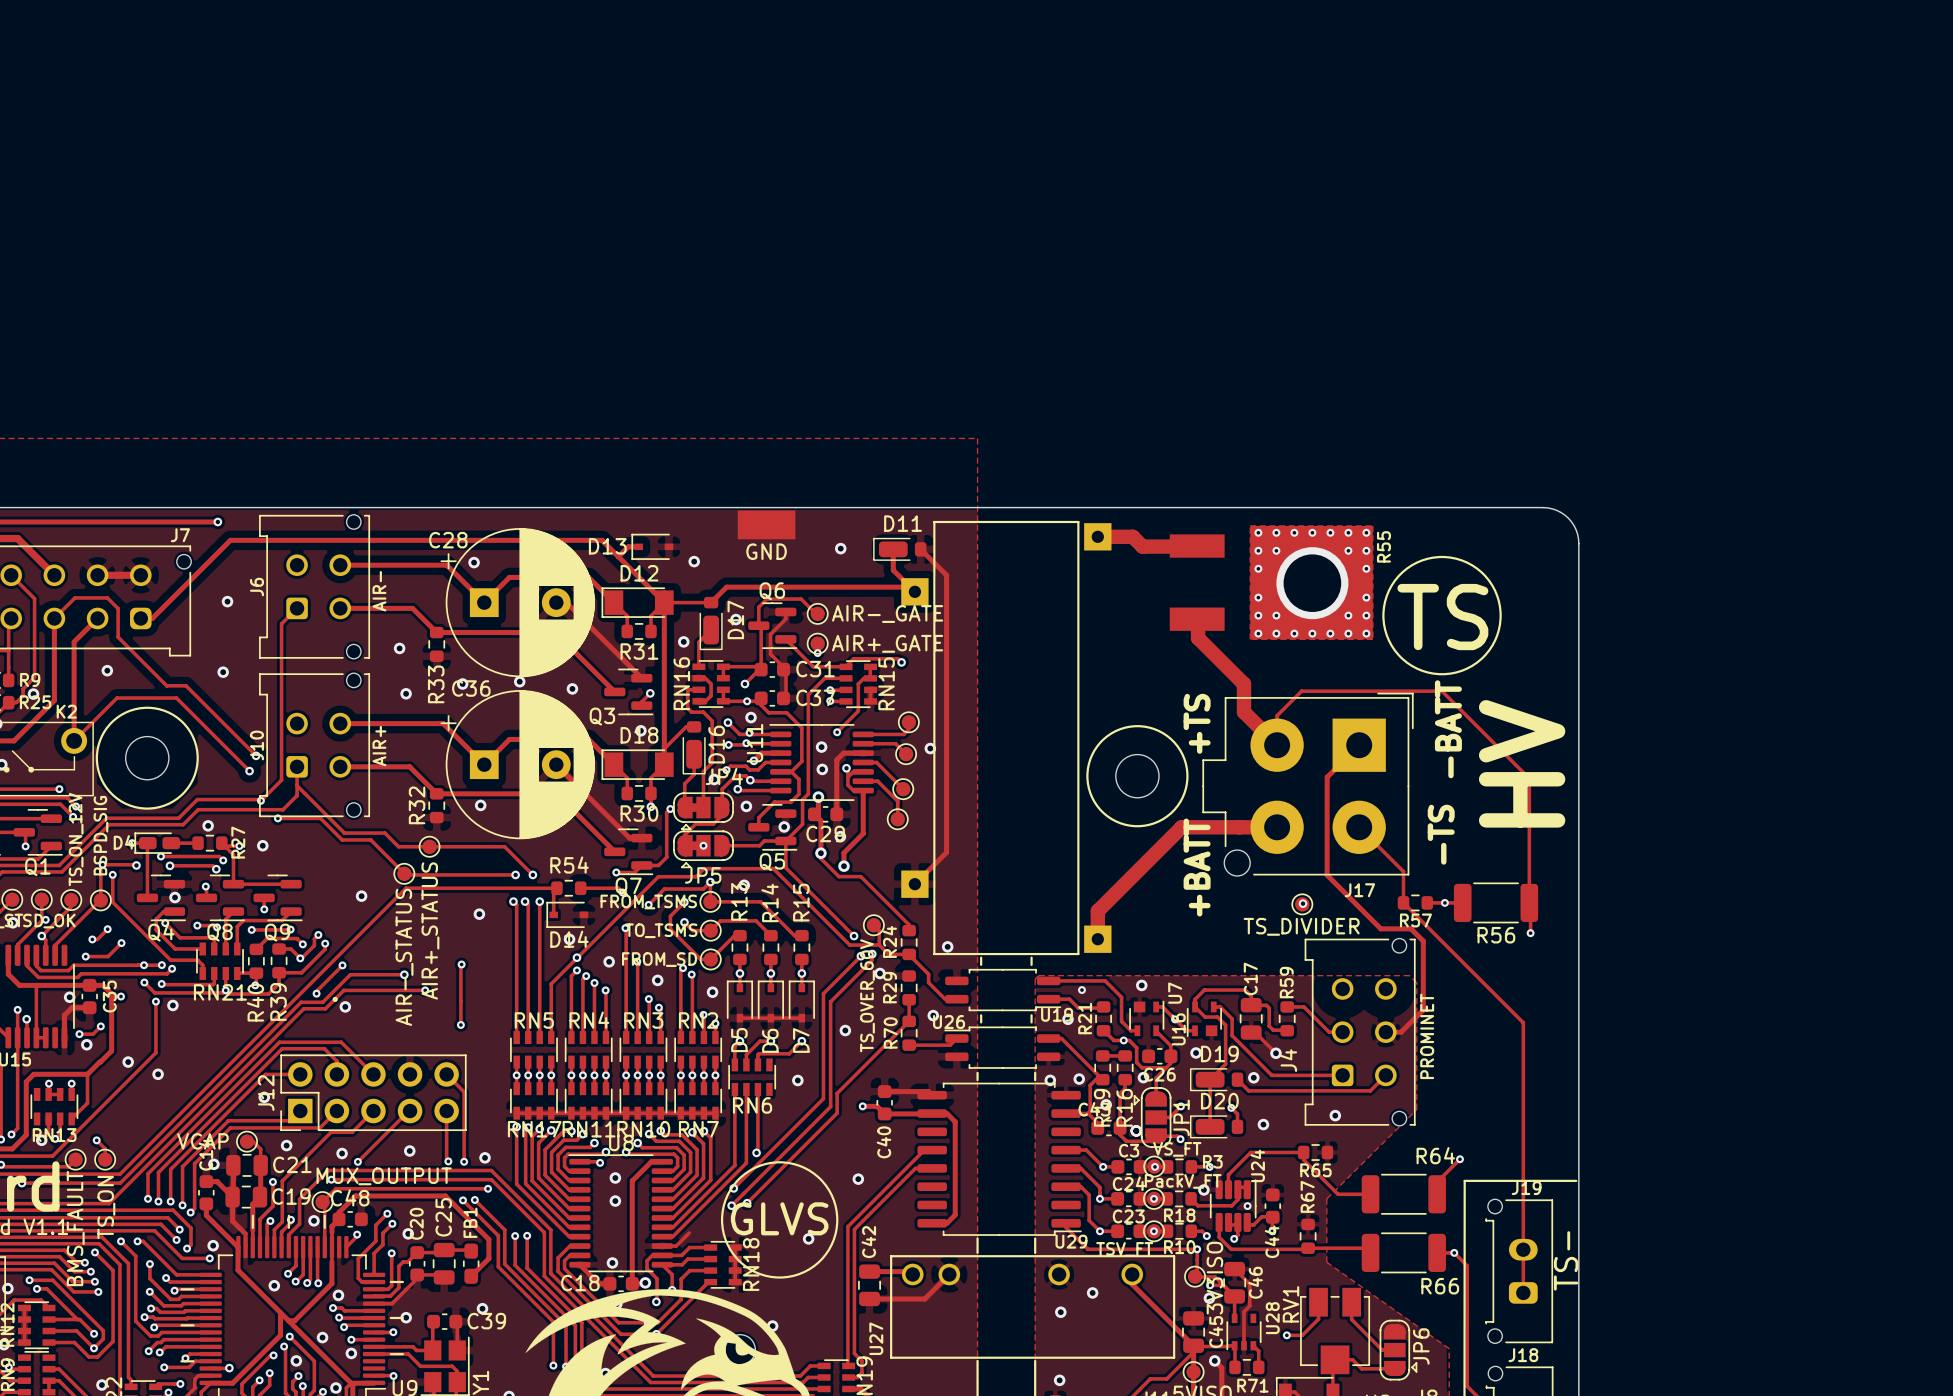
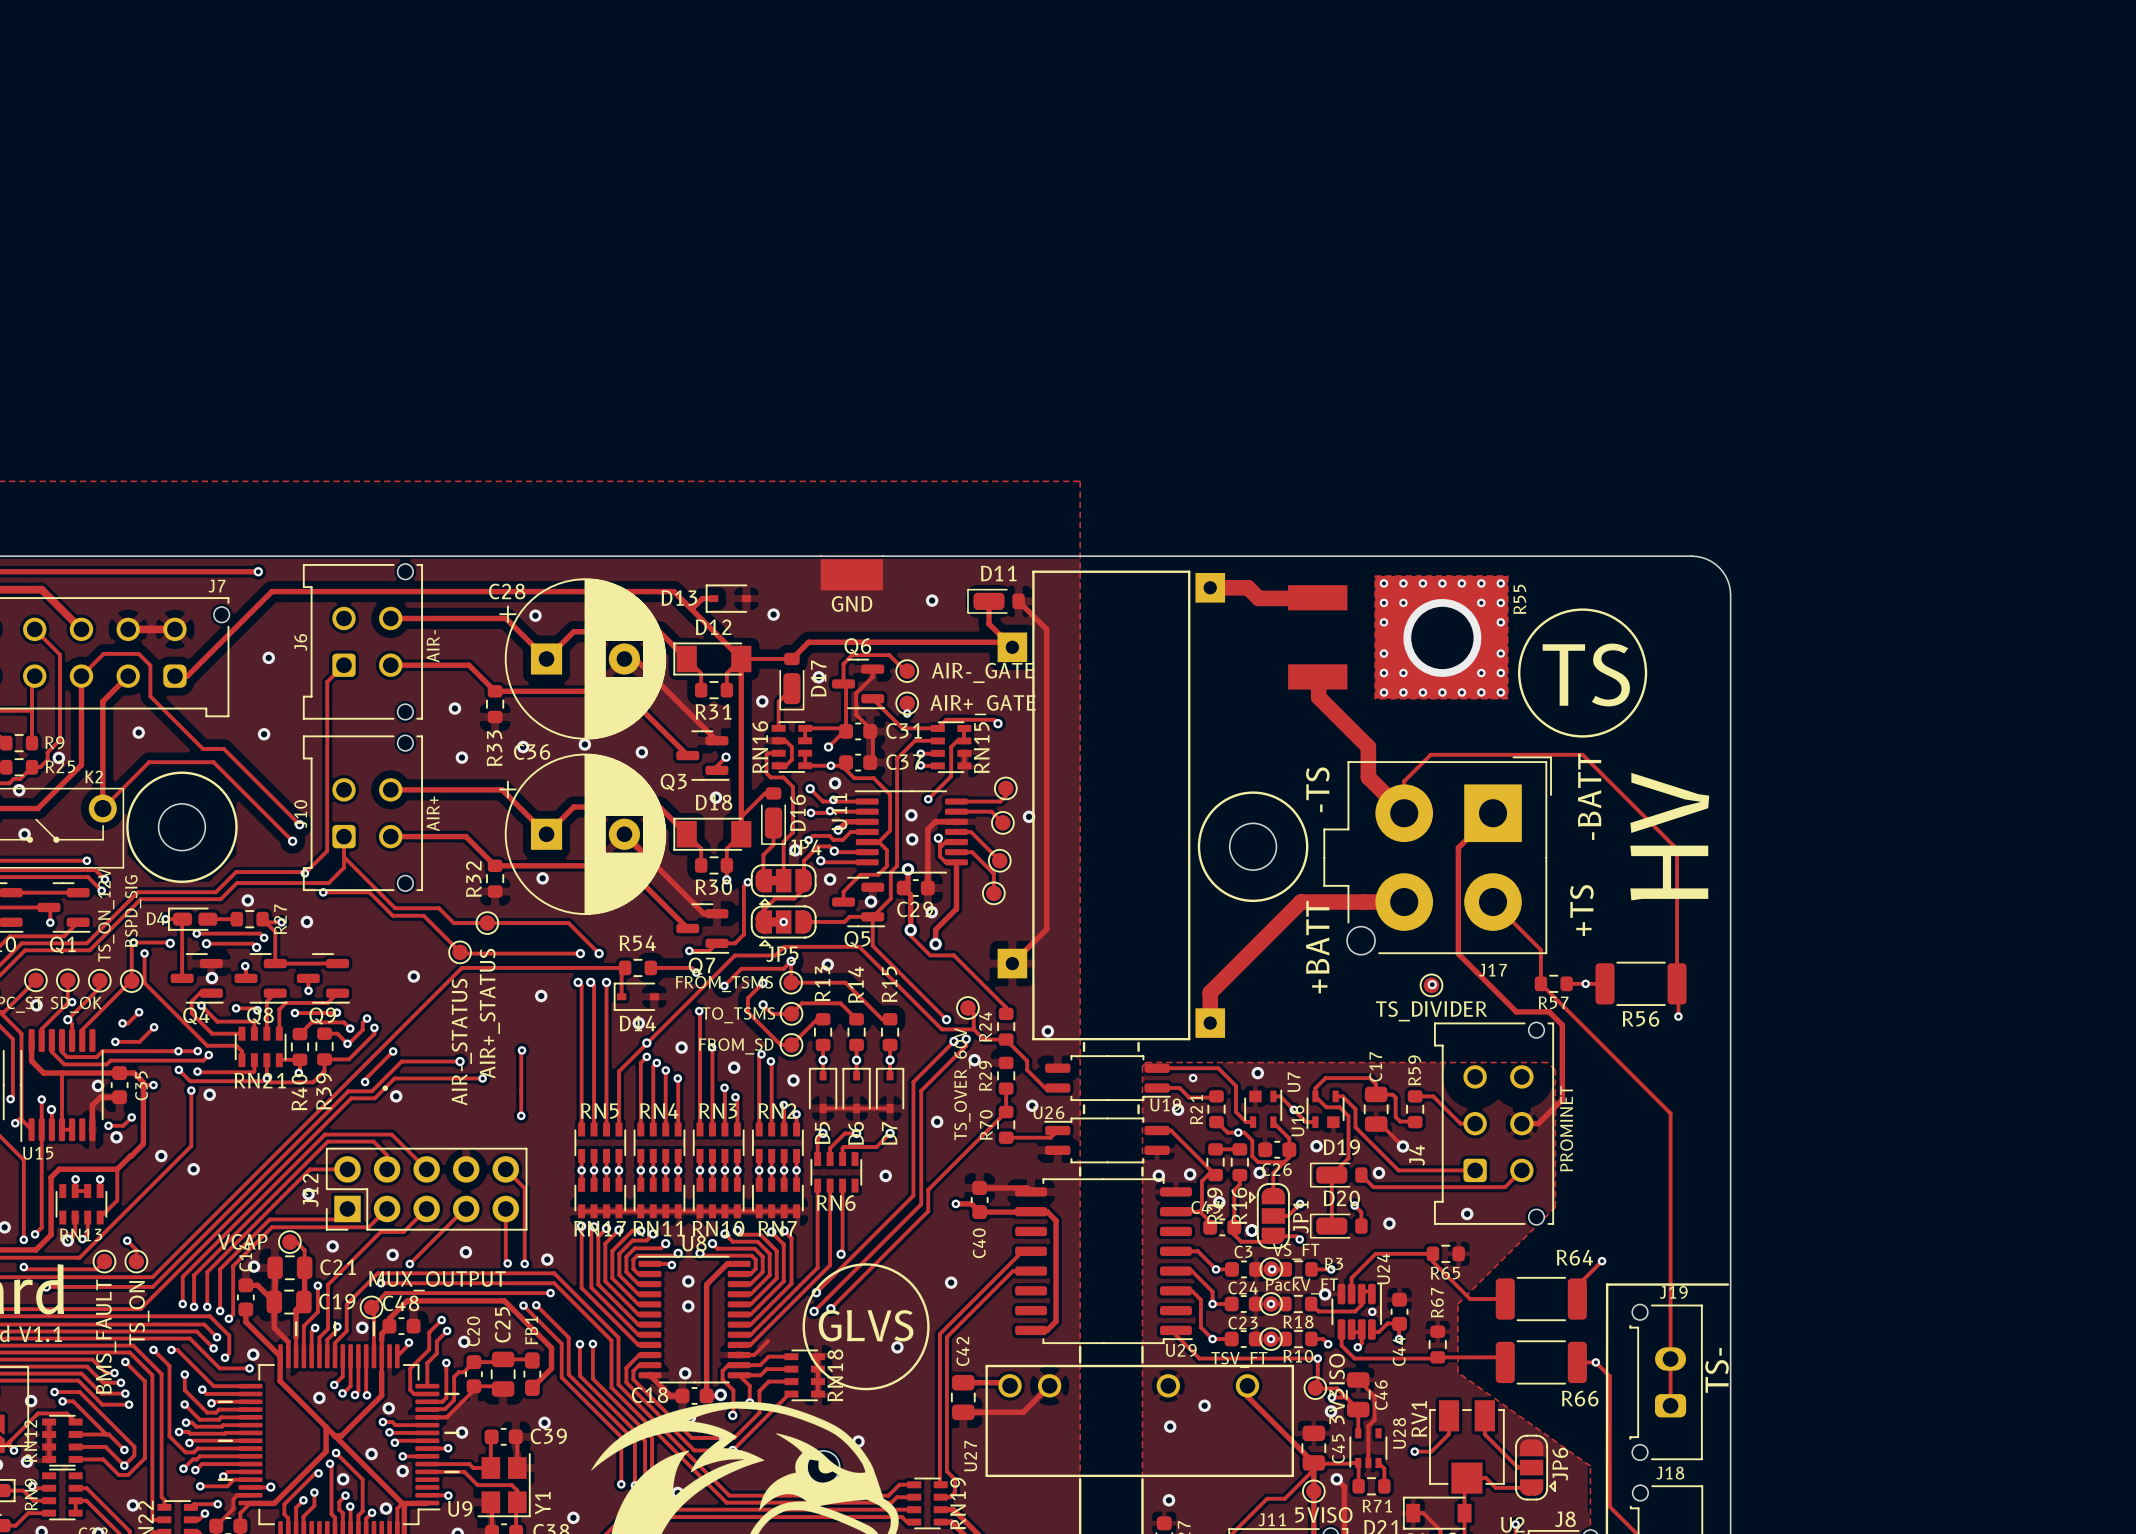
text: +TS (1197, 723) -> -TS (1317, 789)
text: -TS (1441, 834) -> +TS (1581, 910)

